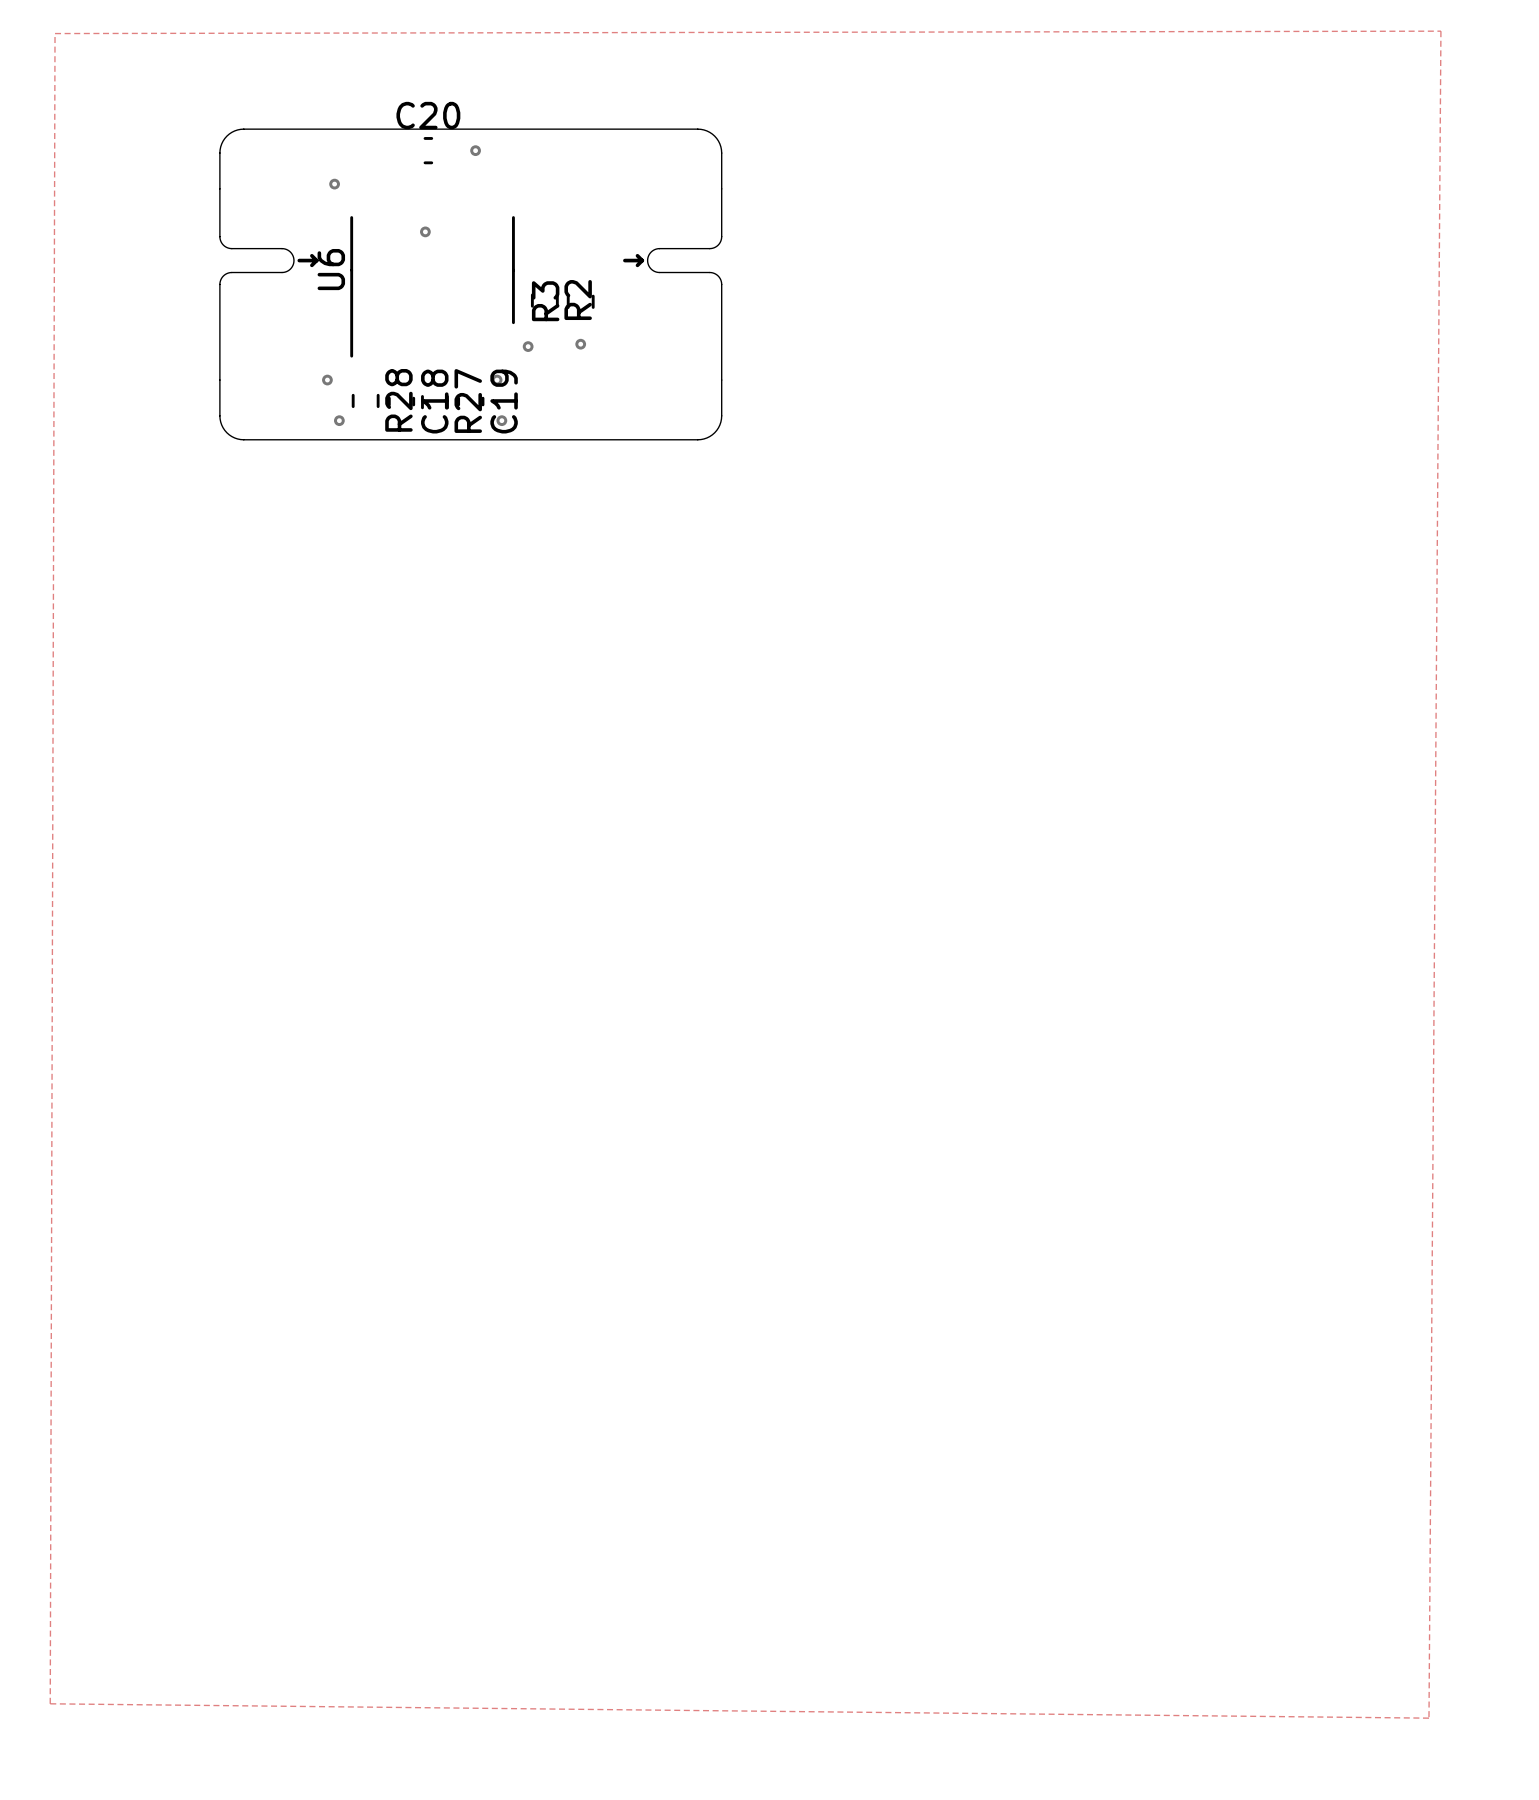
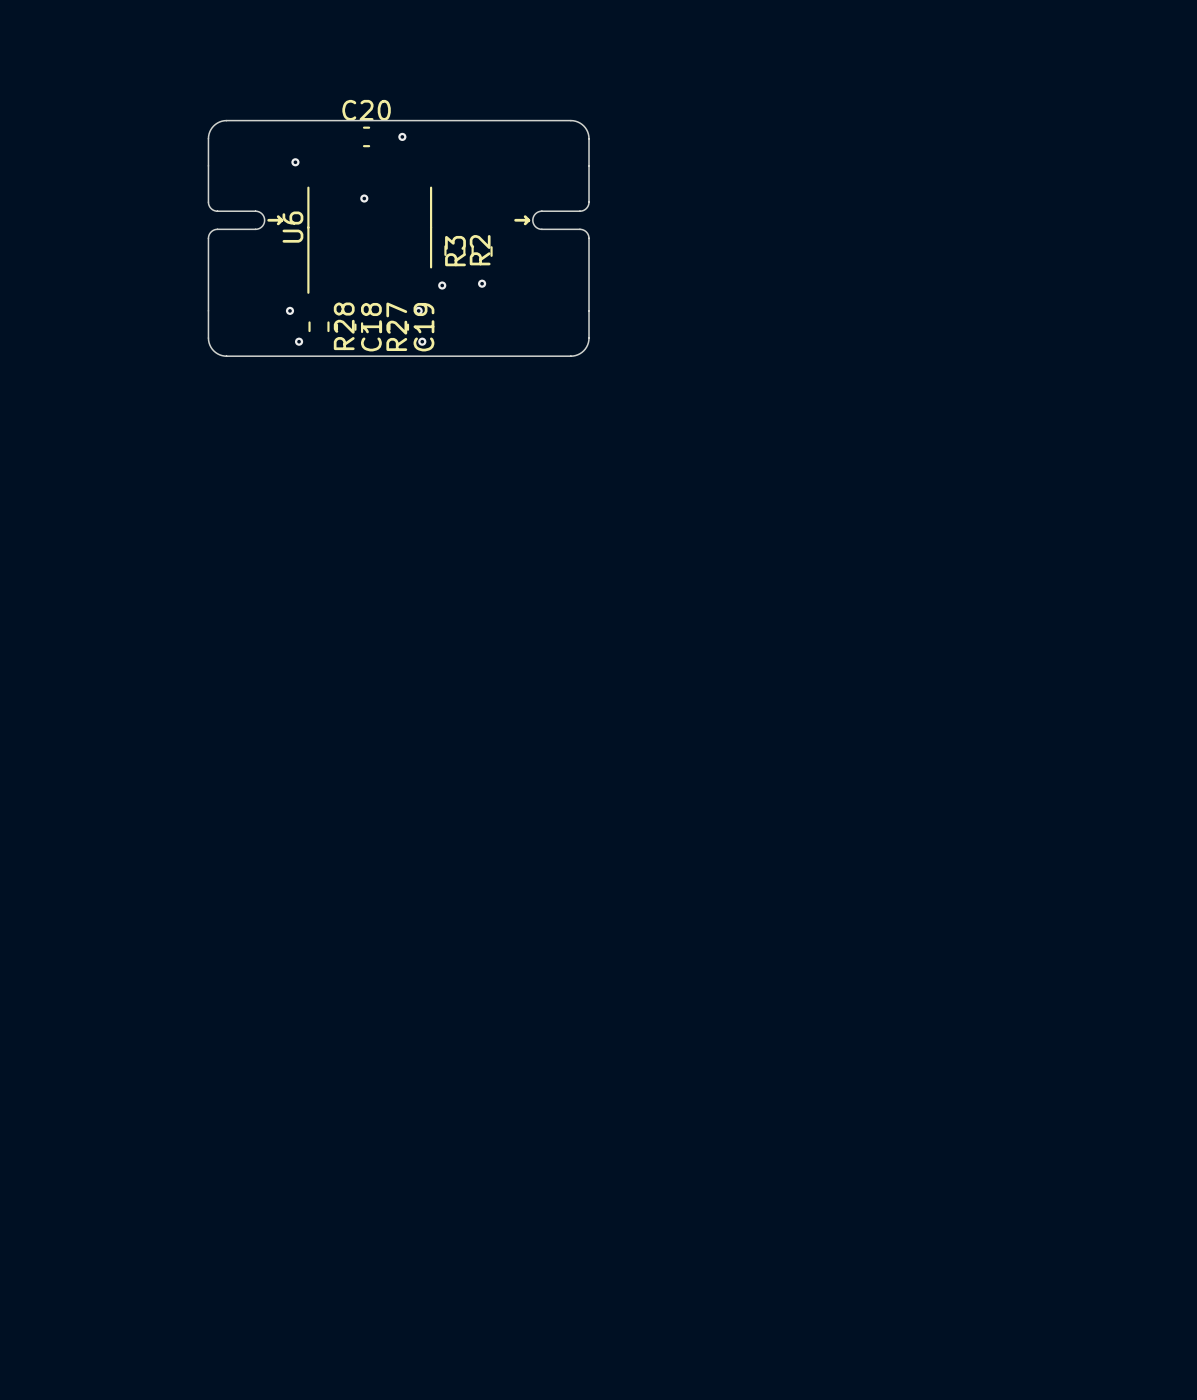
zone outline: (1440, 31) (55, 33) (50, 1703) (1428, 1718) (1440, 31) -> none

